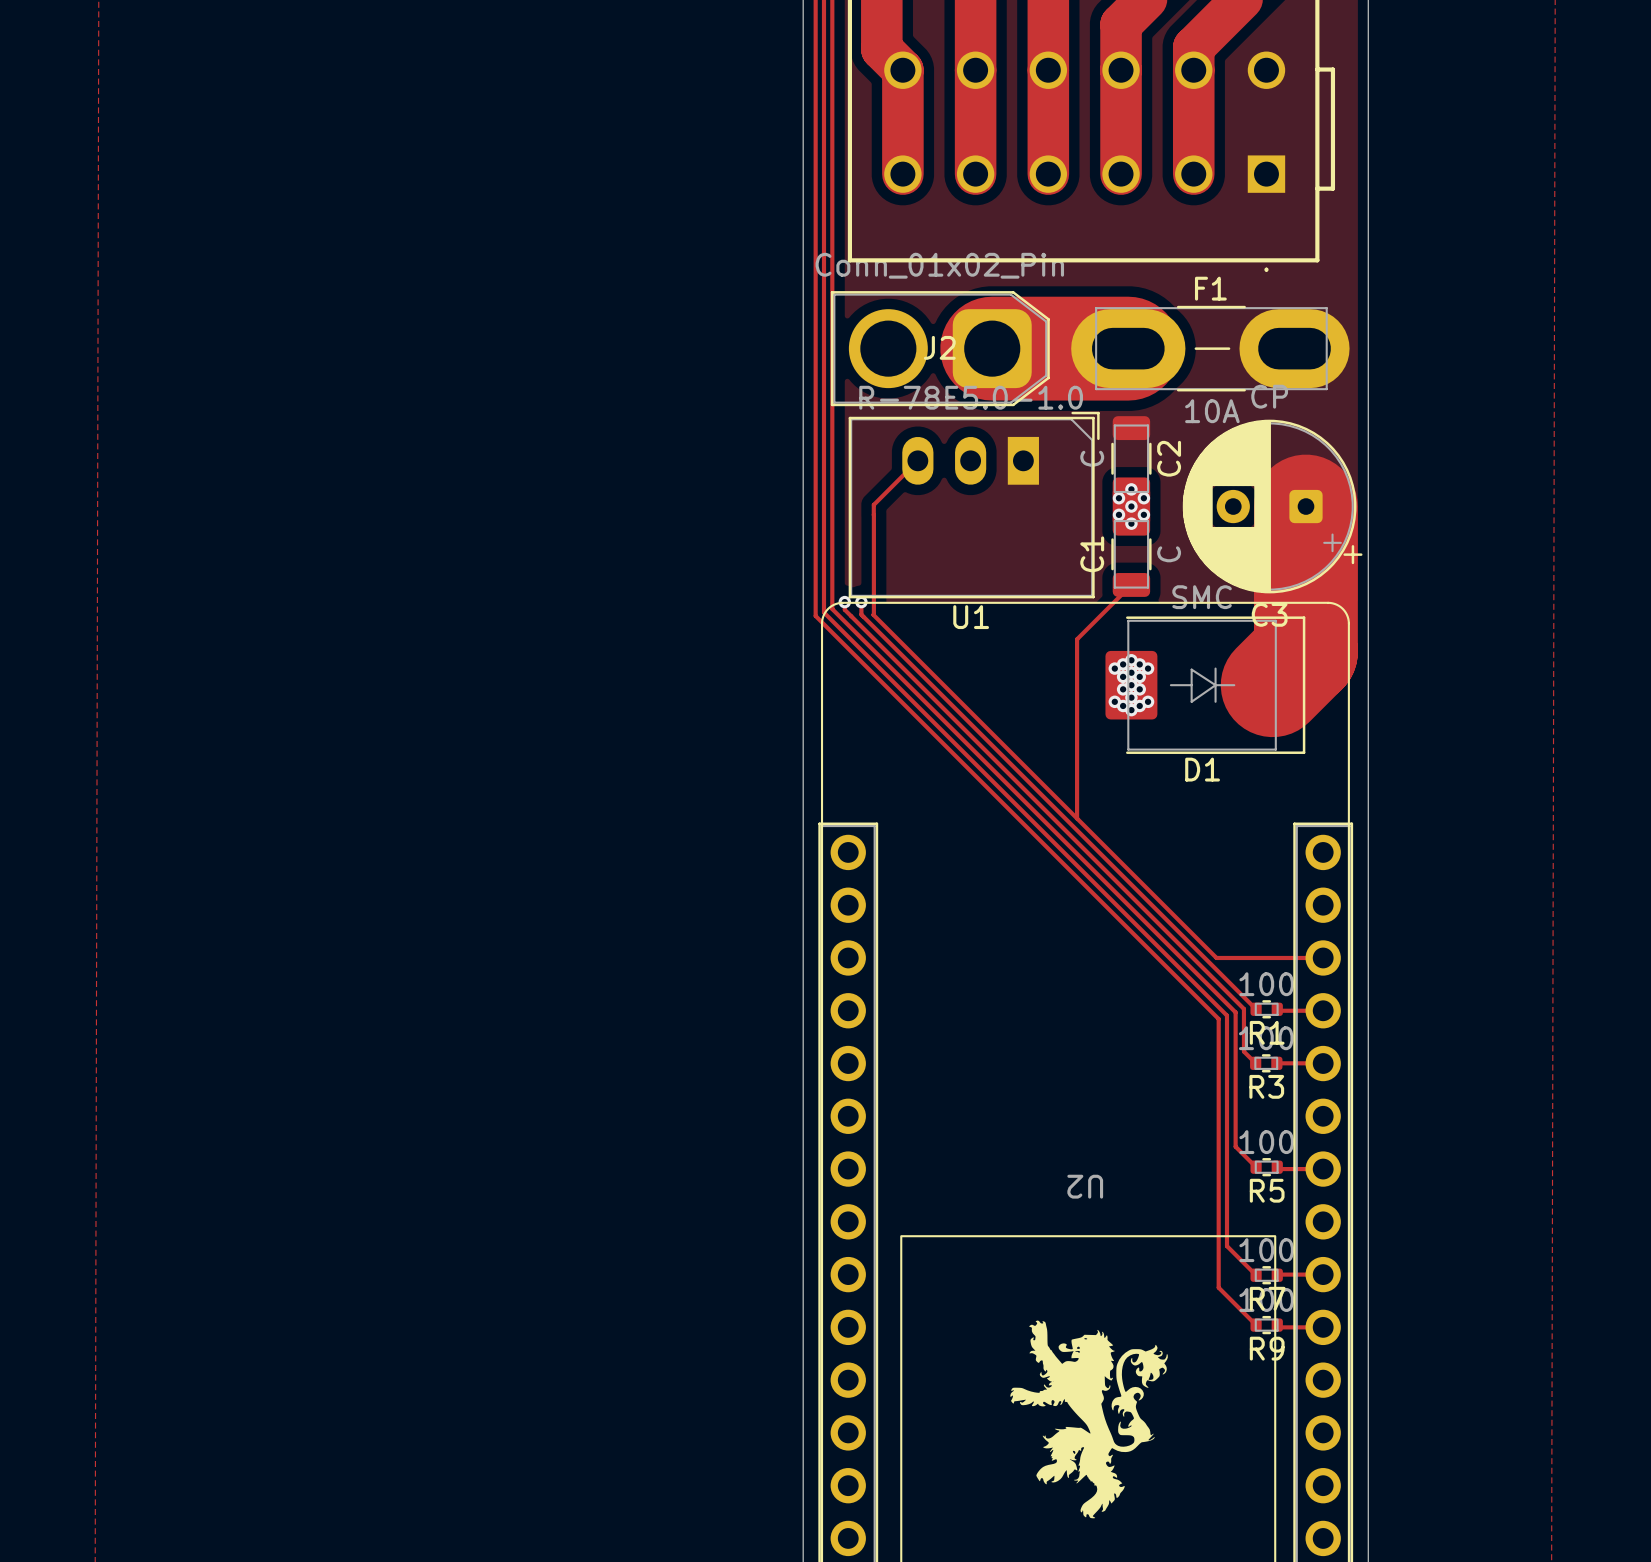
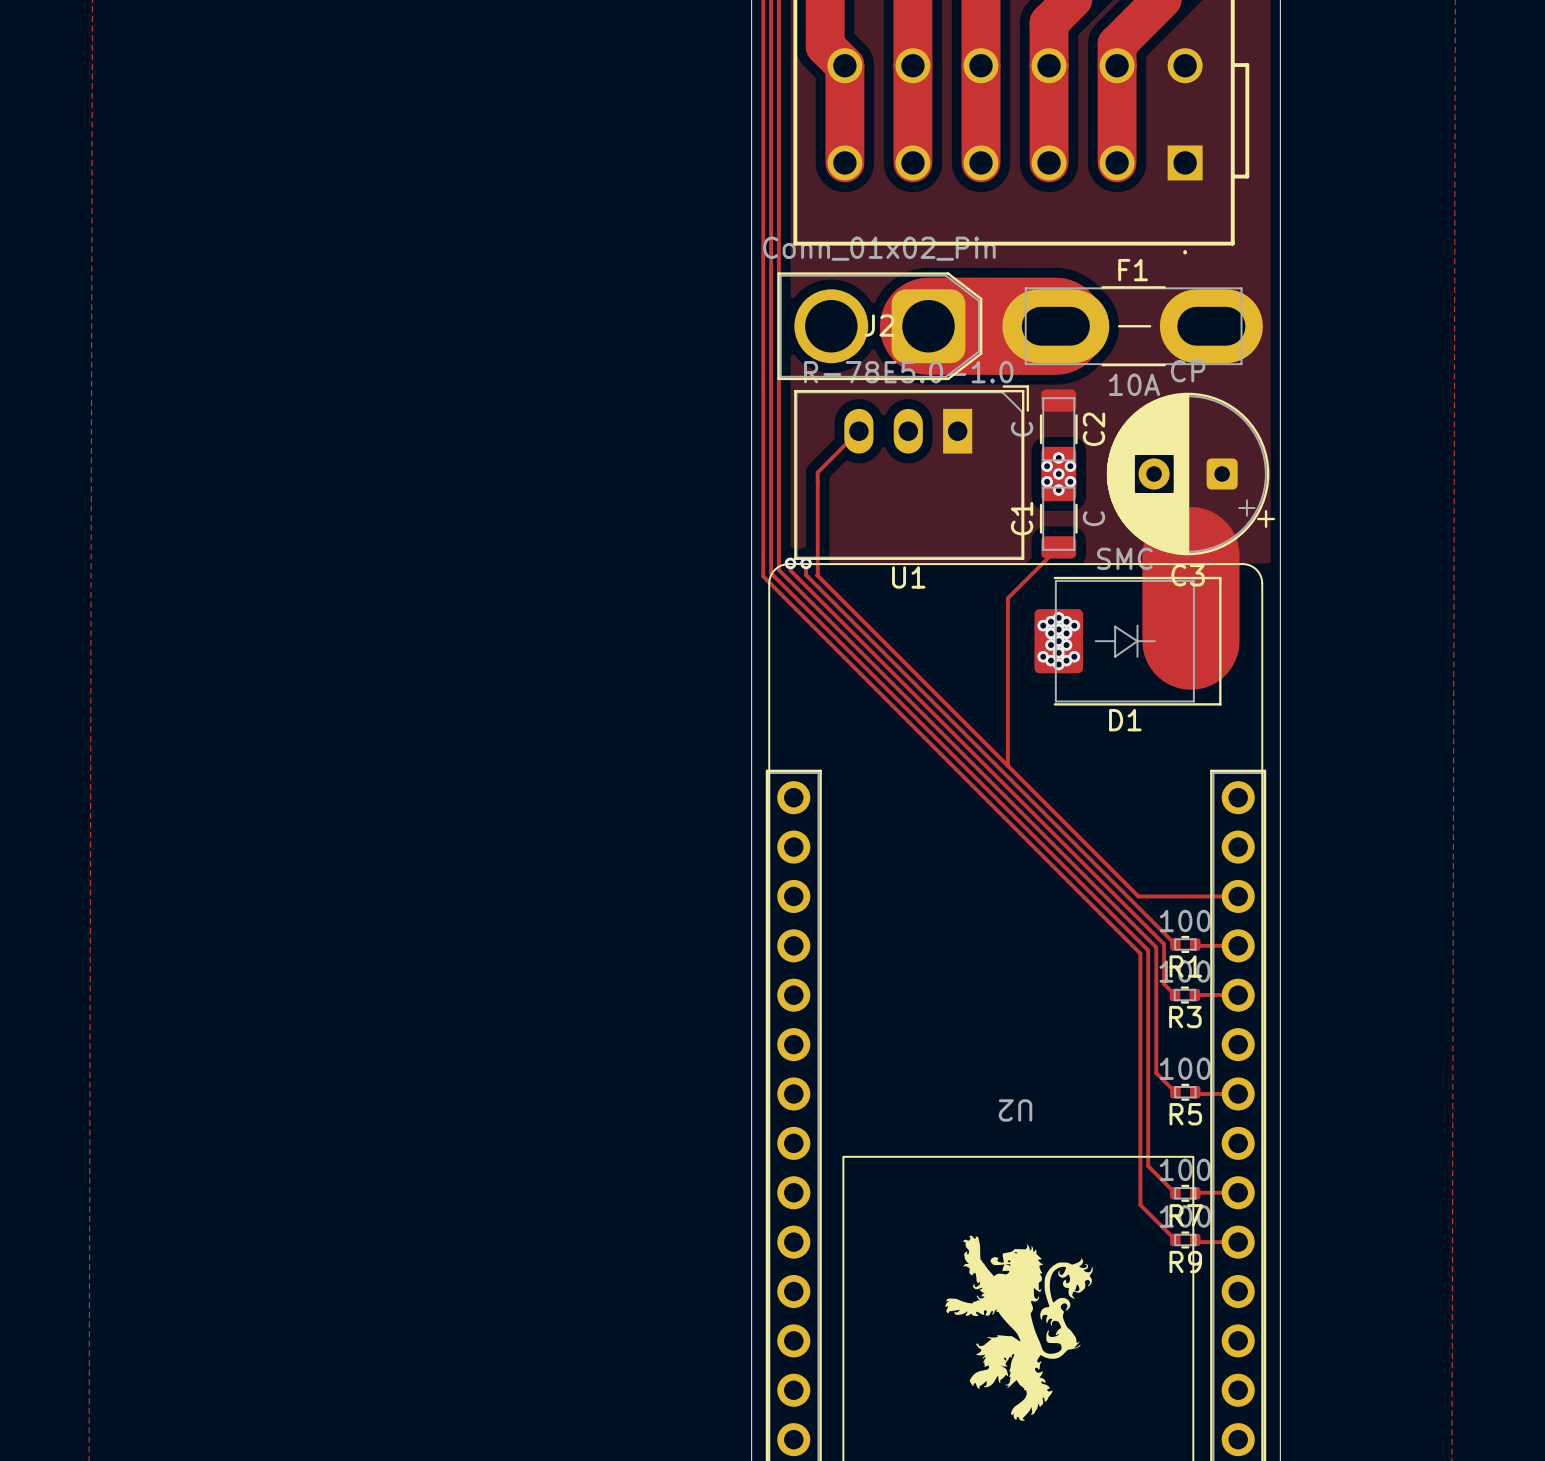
track: (1305, 506) (1305, 651) (1272, 685) -> (1190, 555) (1190, 641)

